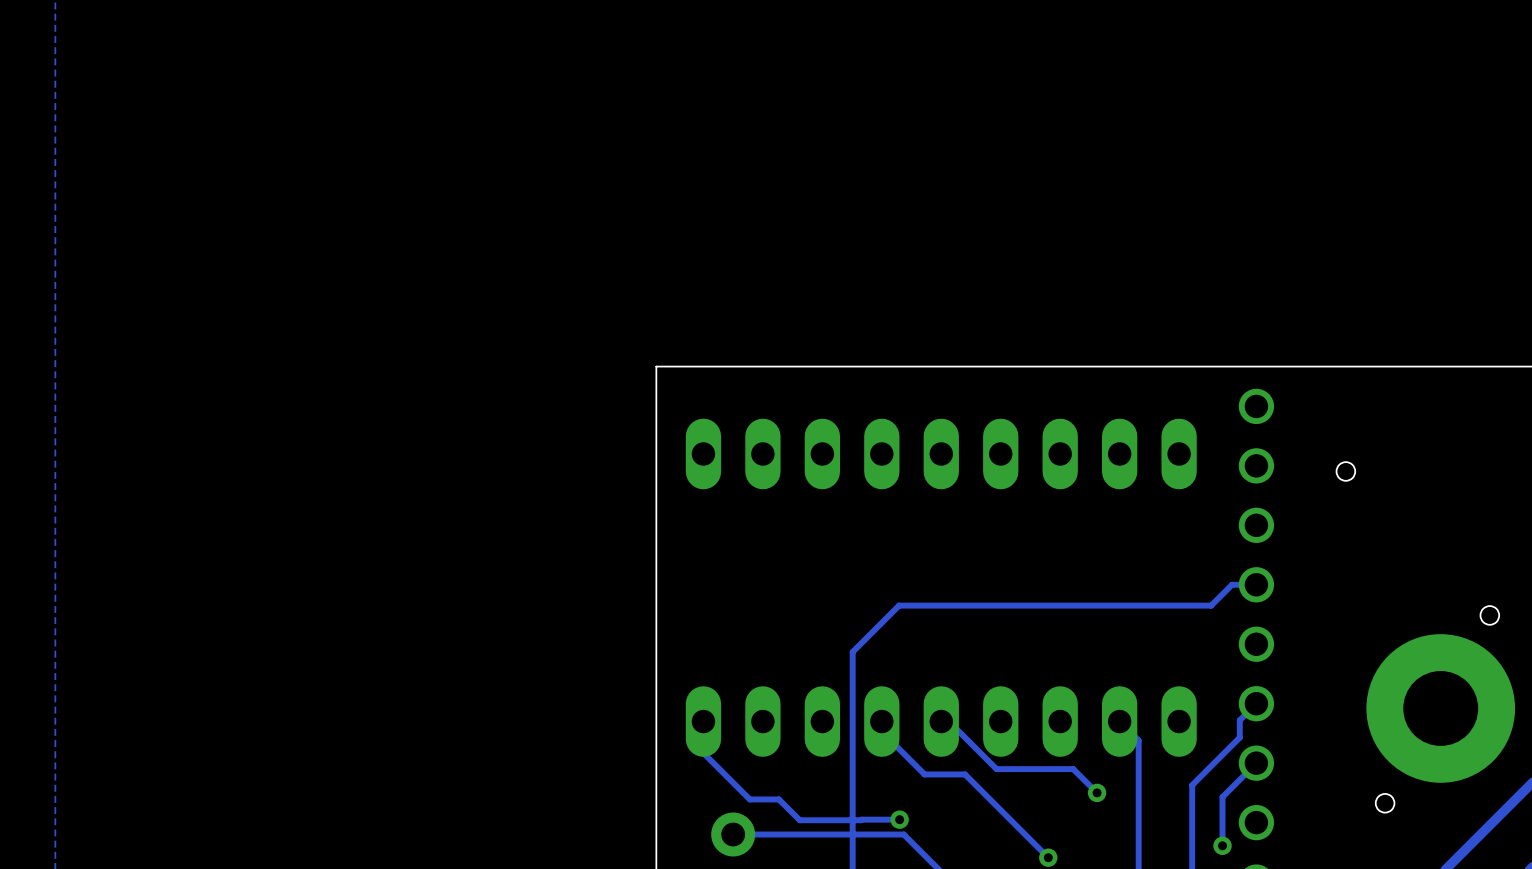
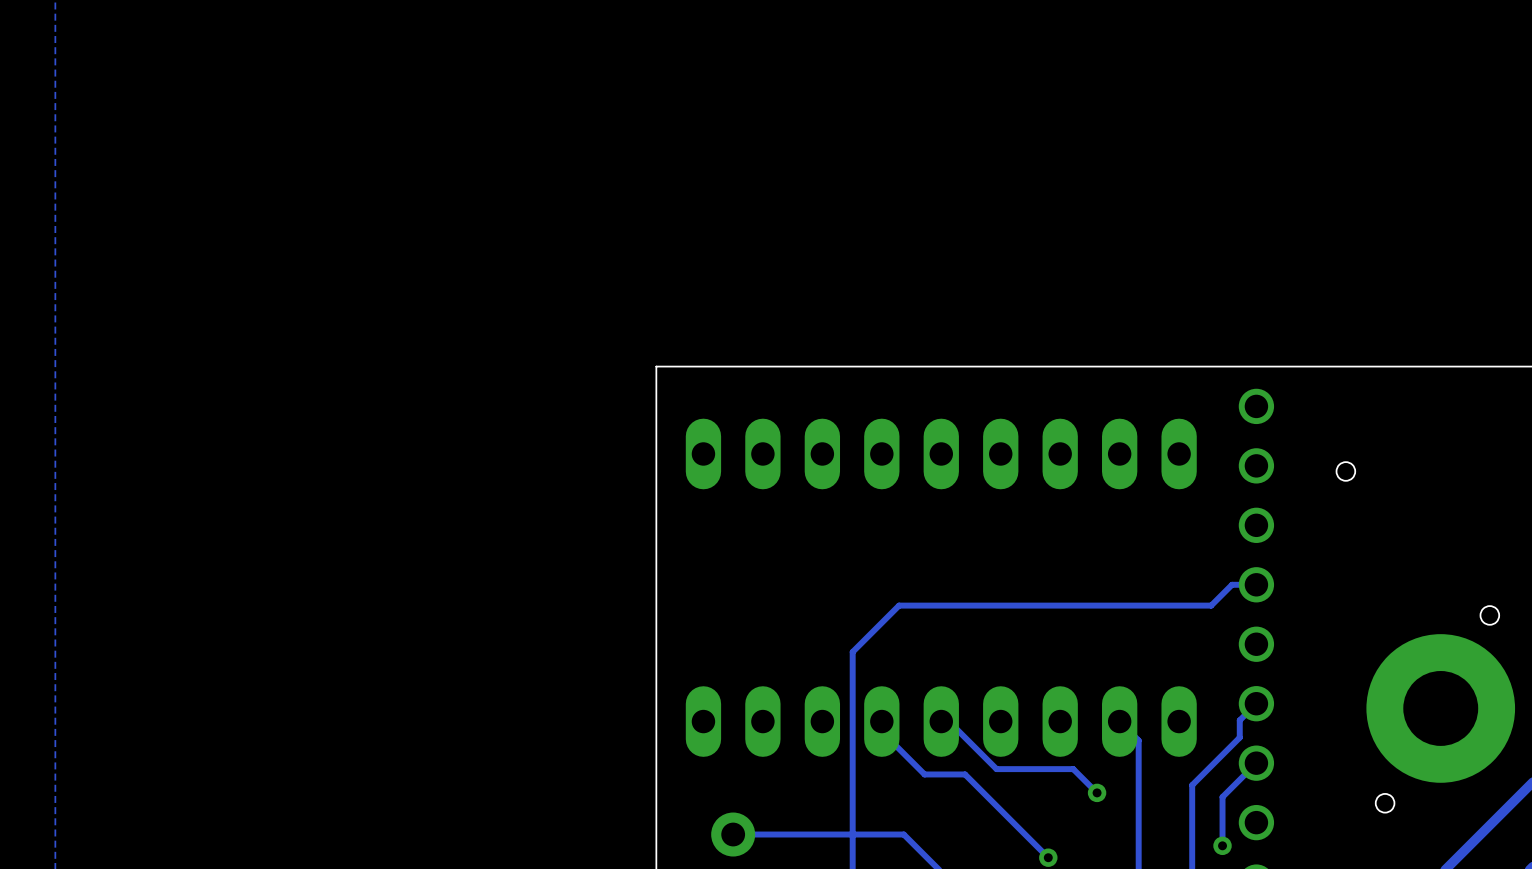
track: (703, 721) (703, 753) (749, 799) (778, 799) (799, 820) (899, 819) -> none
via: (899, 819) -> none

